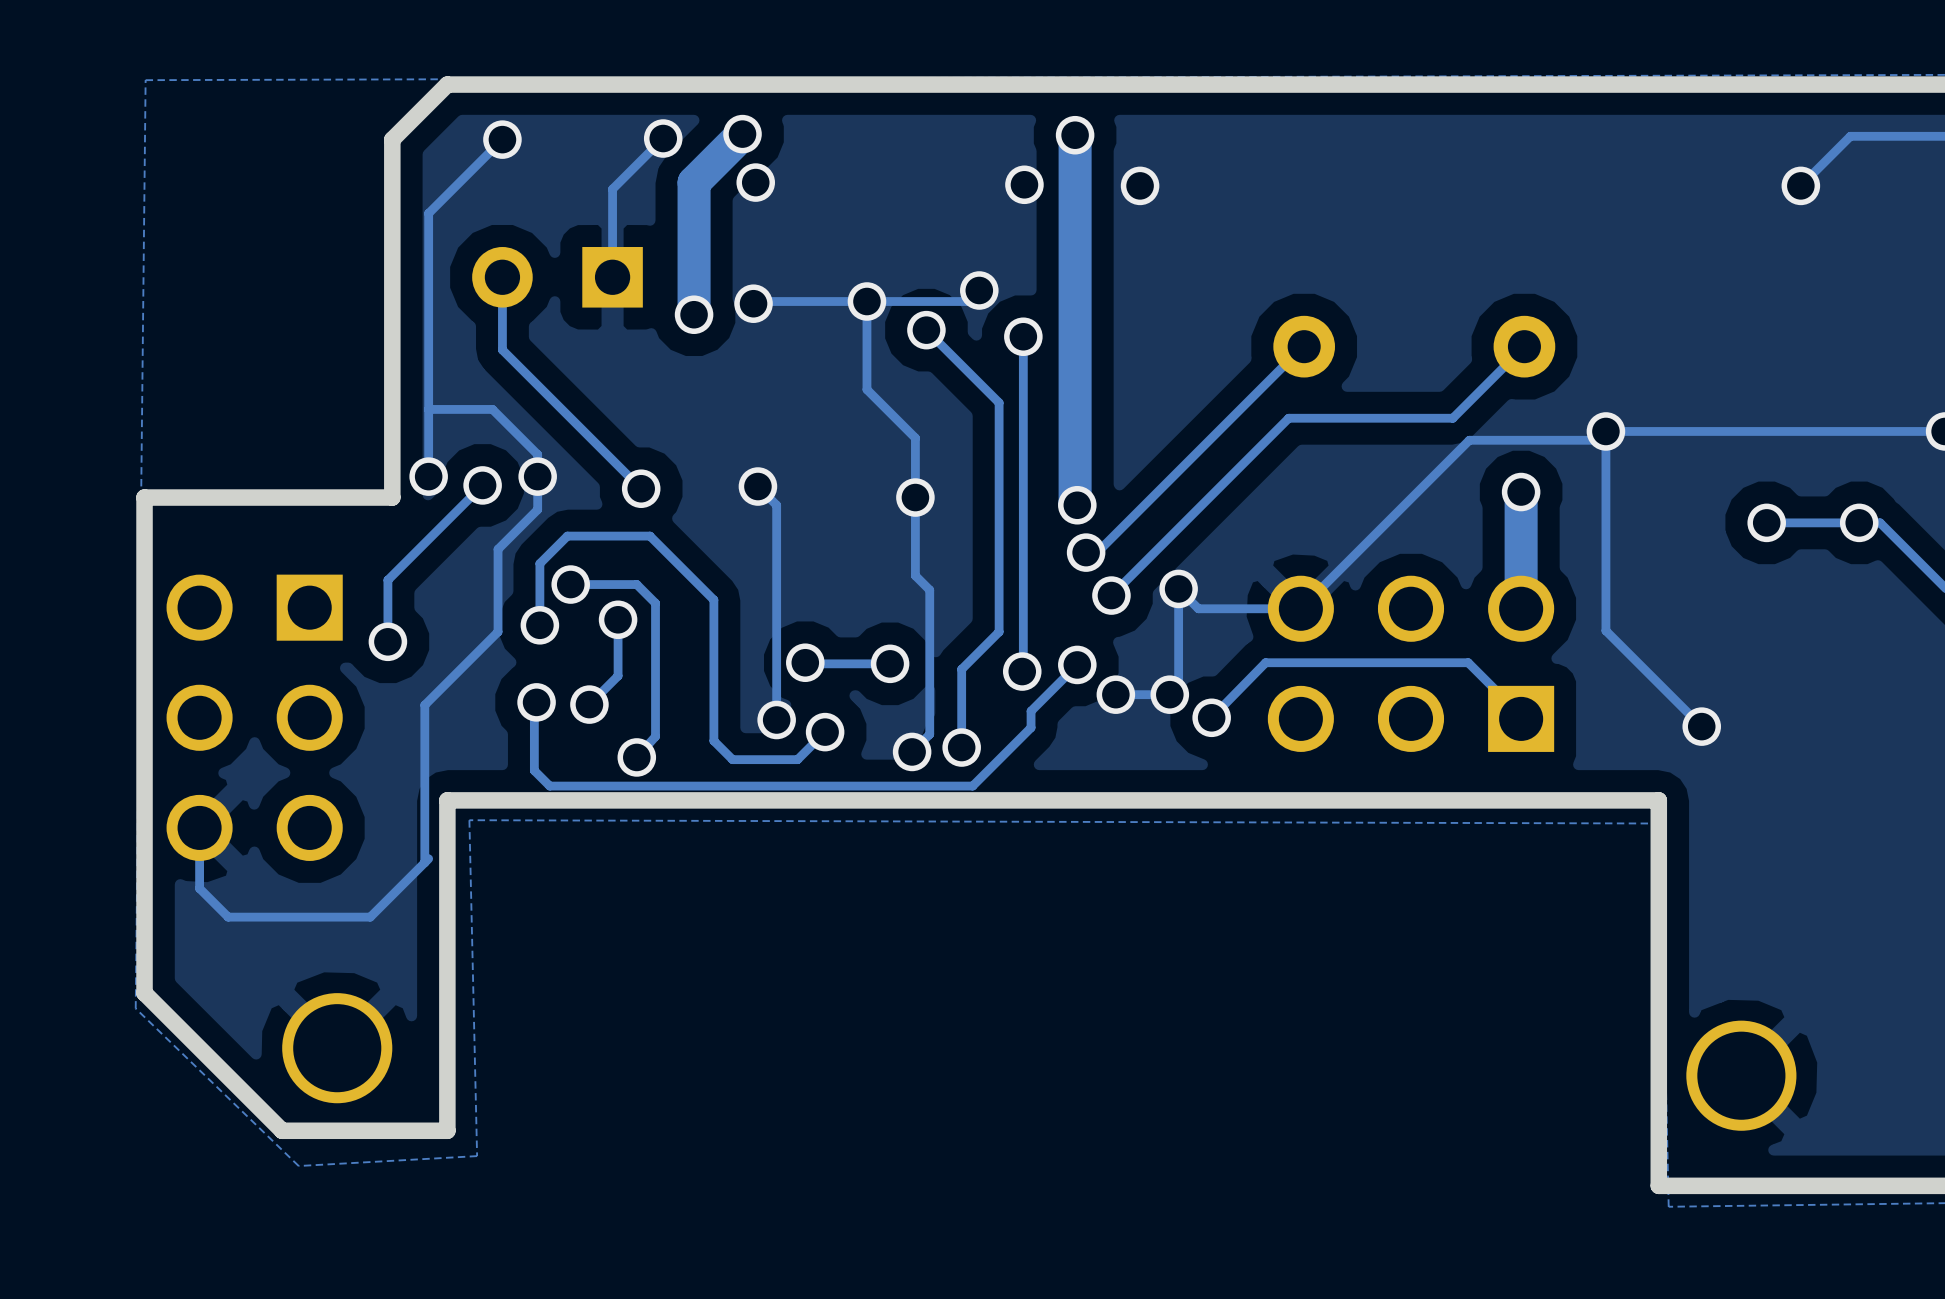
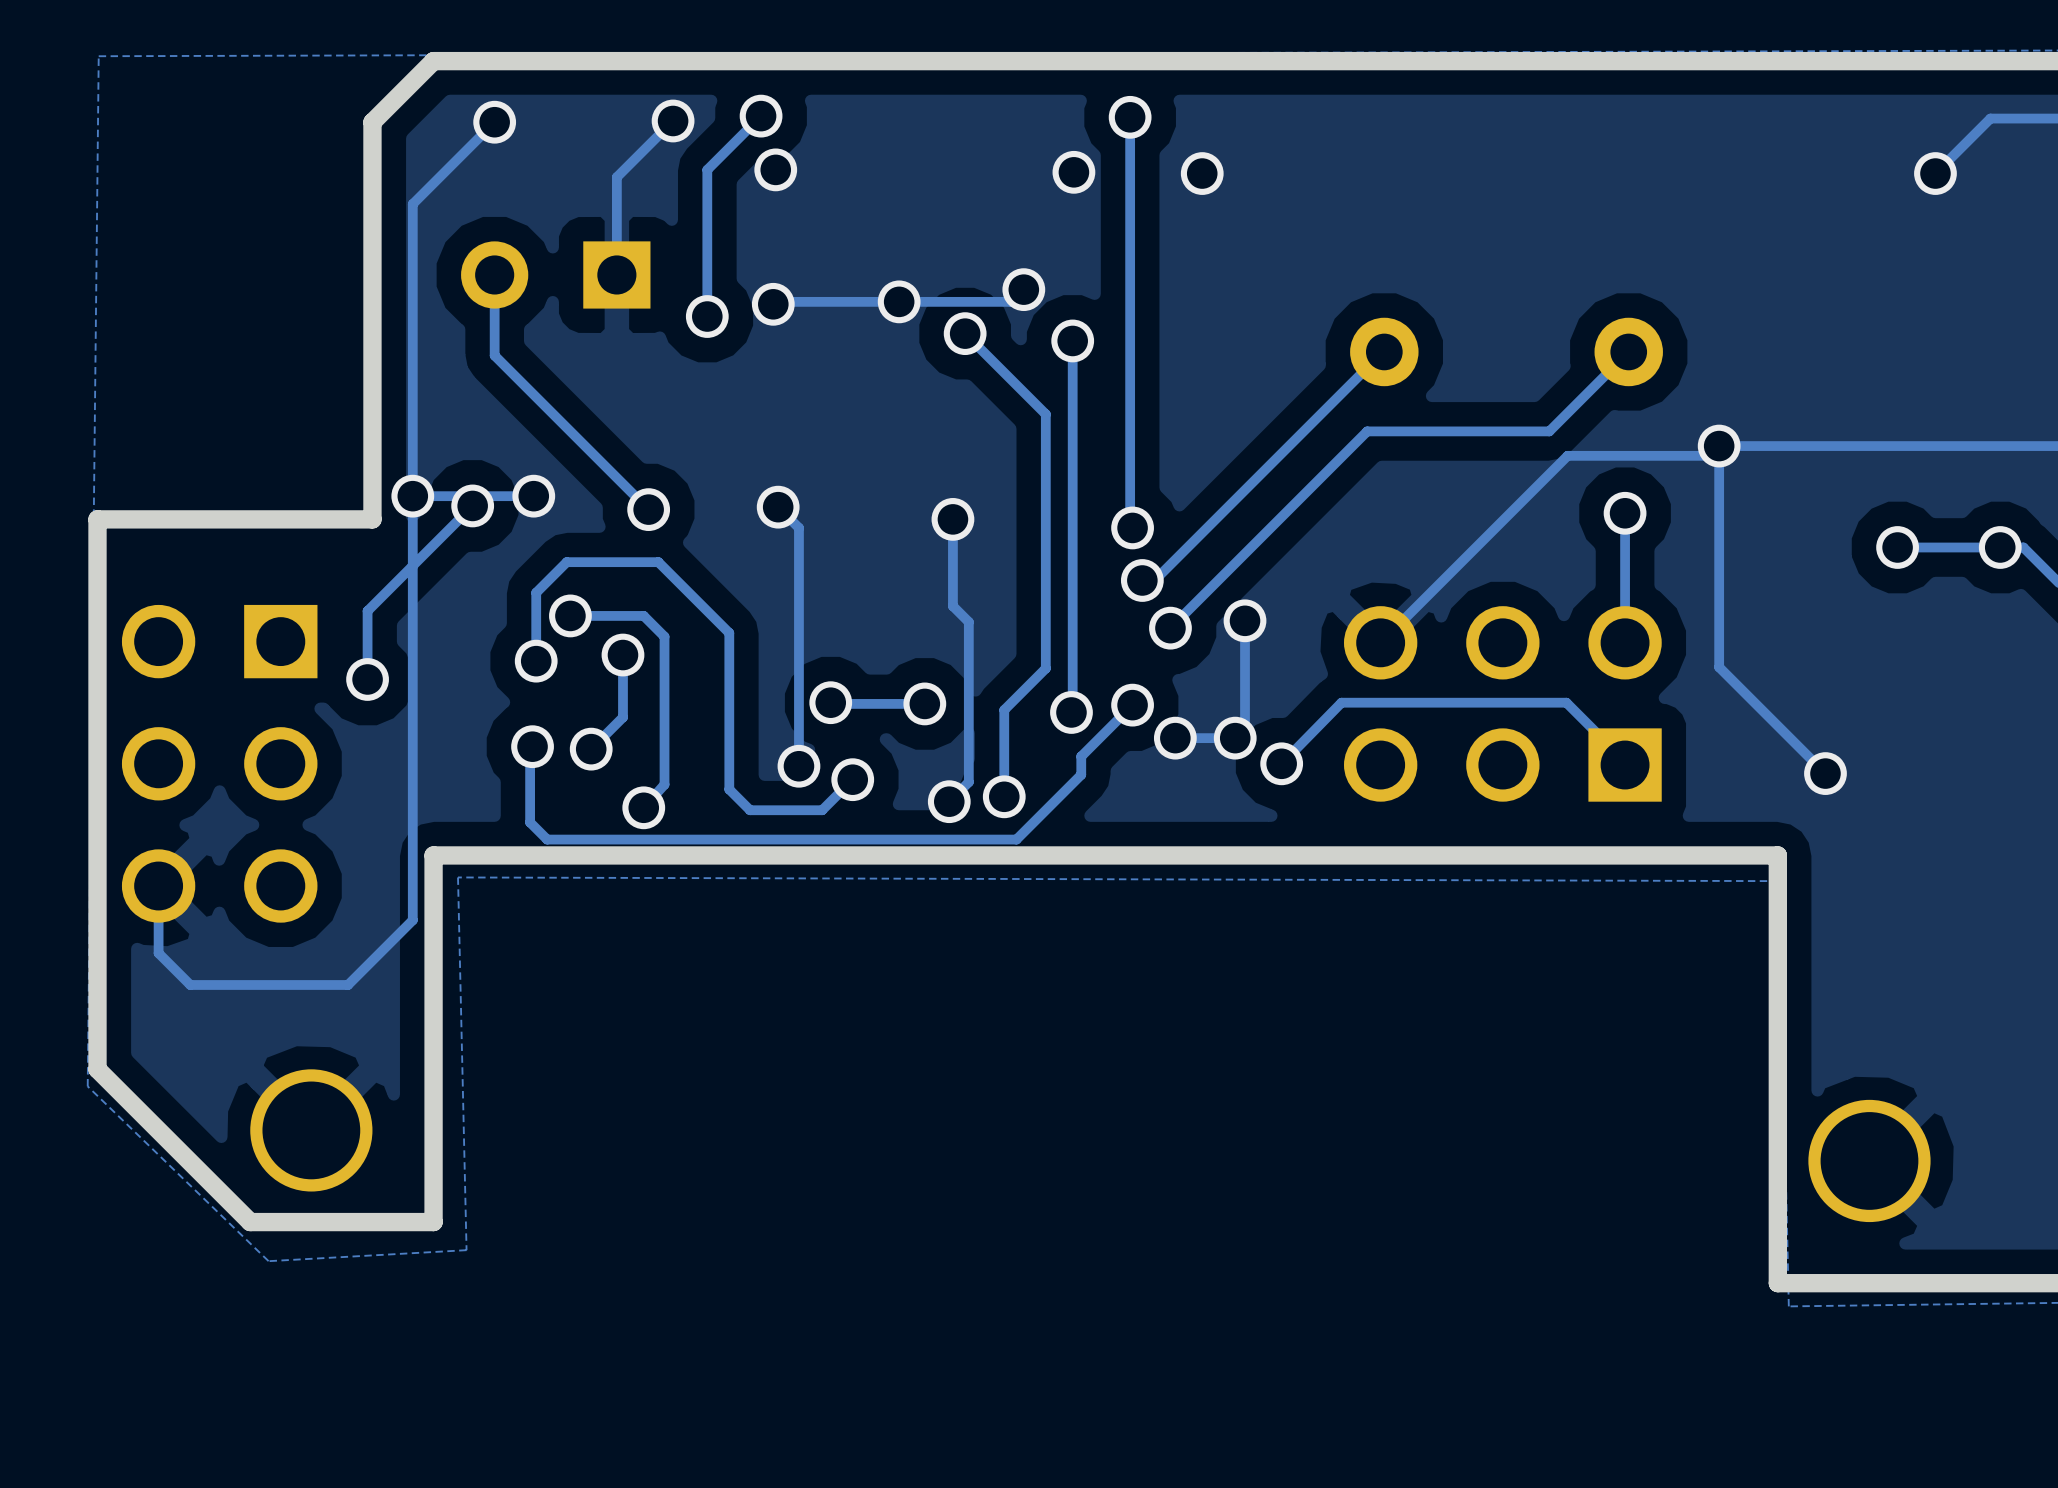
track width: thick (742, 134) (694, 182) (694, 314) -> thin (761, 116) (707, 169) (707, 316)
track width: thick (1075, 135) (1075, 503) (1077, 505) -> thin (1130, 117) (1130, 525) (1132, 527)
track: (866, 301) (866, 389) (915, 438) (915, 497) -> none
track: (428, 409) (492, 409) (537, 454) (537, 509) (498, 549) (498, 631) (424, 705) (424, 862) -> none
track: none -> (533, 496) (412, 496) (412, 920)
track width: thick (1521, 492) (1521, 608) -> thin (1625, 513) (1625, 642)
track: (1178, 588) (1198, 608) (1300, 608) -> none

